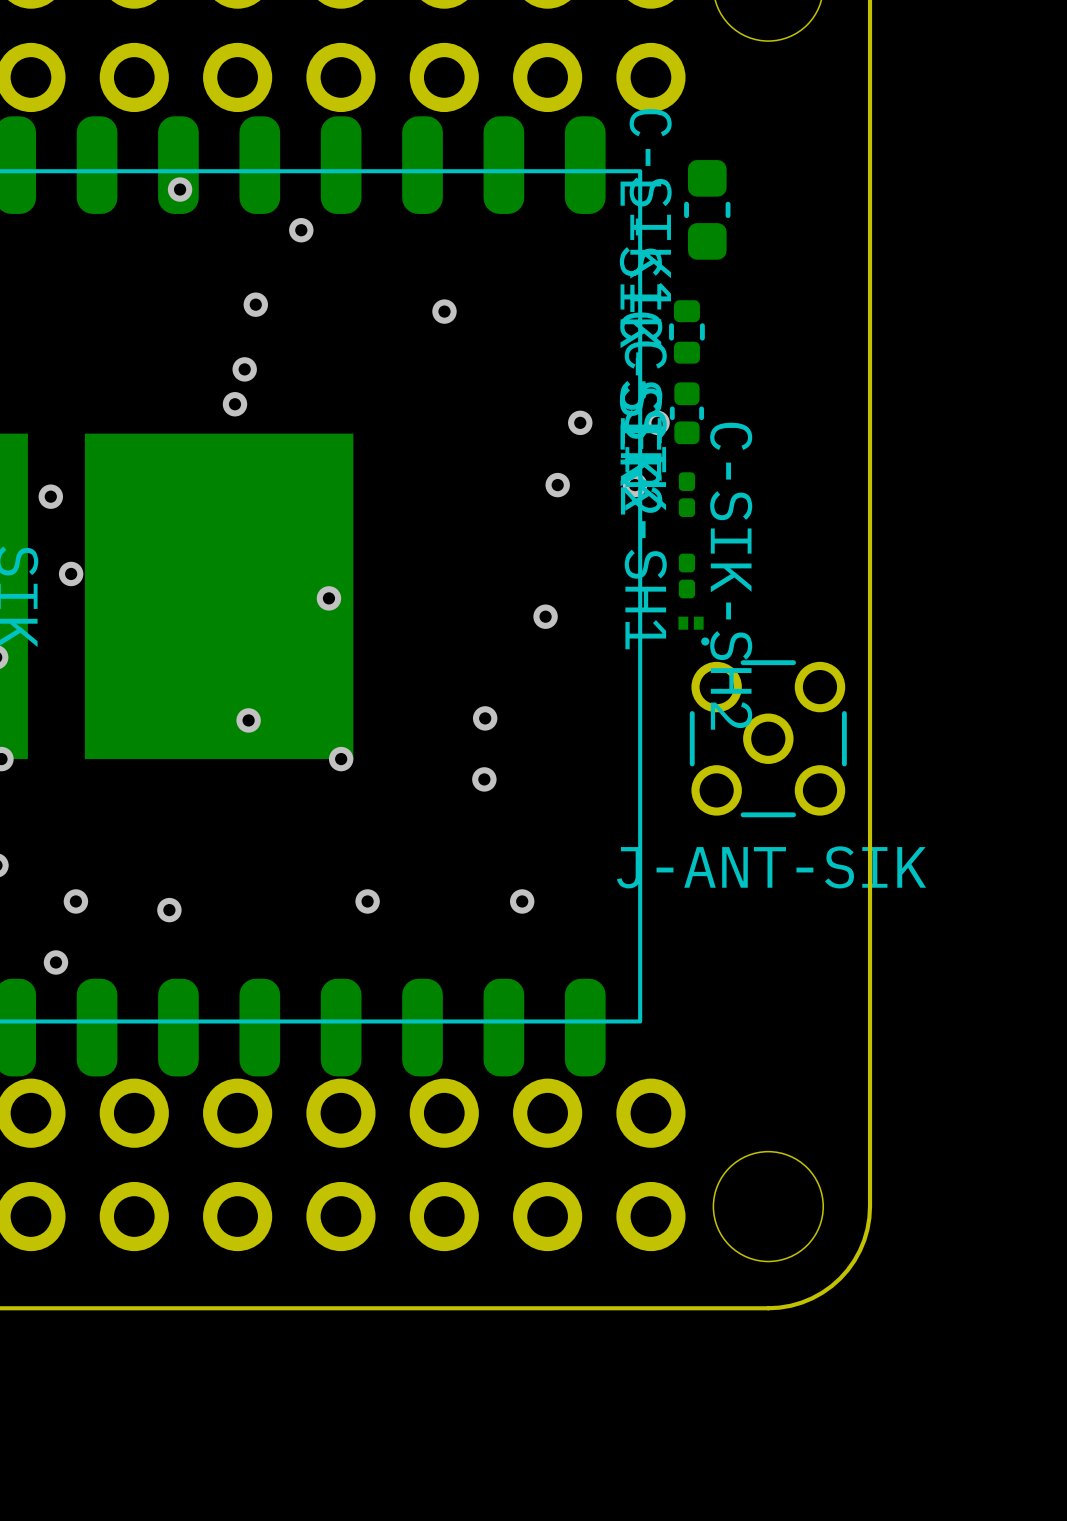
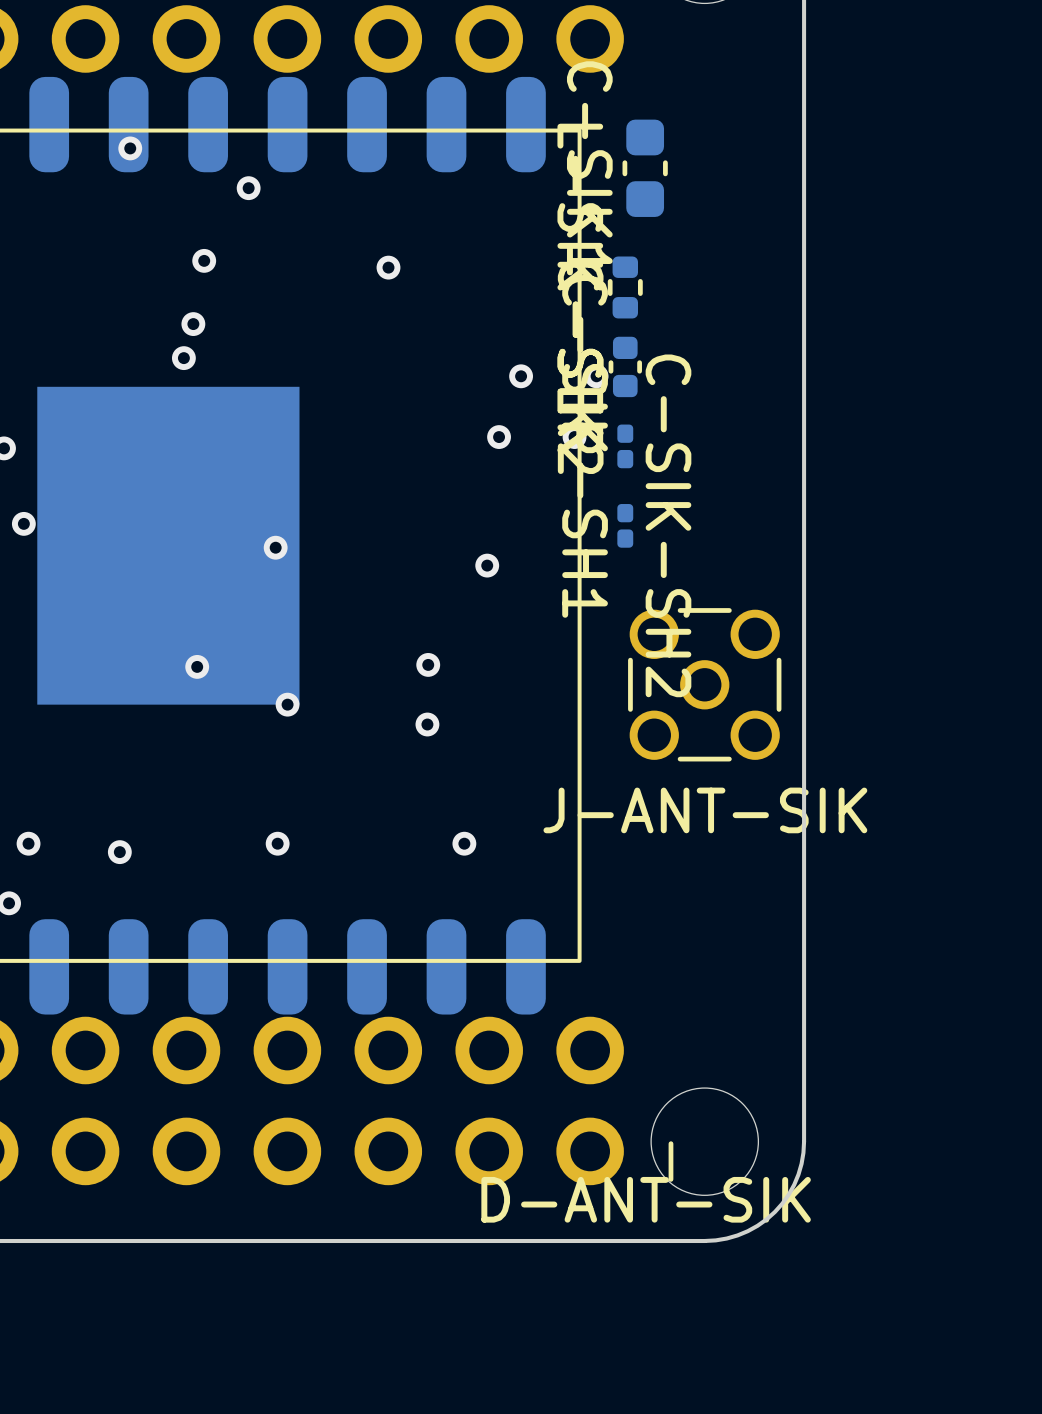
part: (693, 631) -> none
via position: (367, 901) -> (277, 843)
D-ANT-SIK: none -> (645, 1161)

